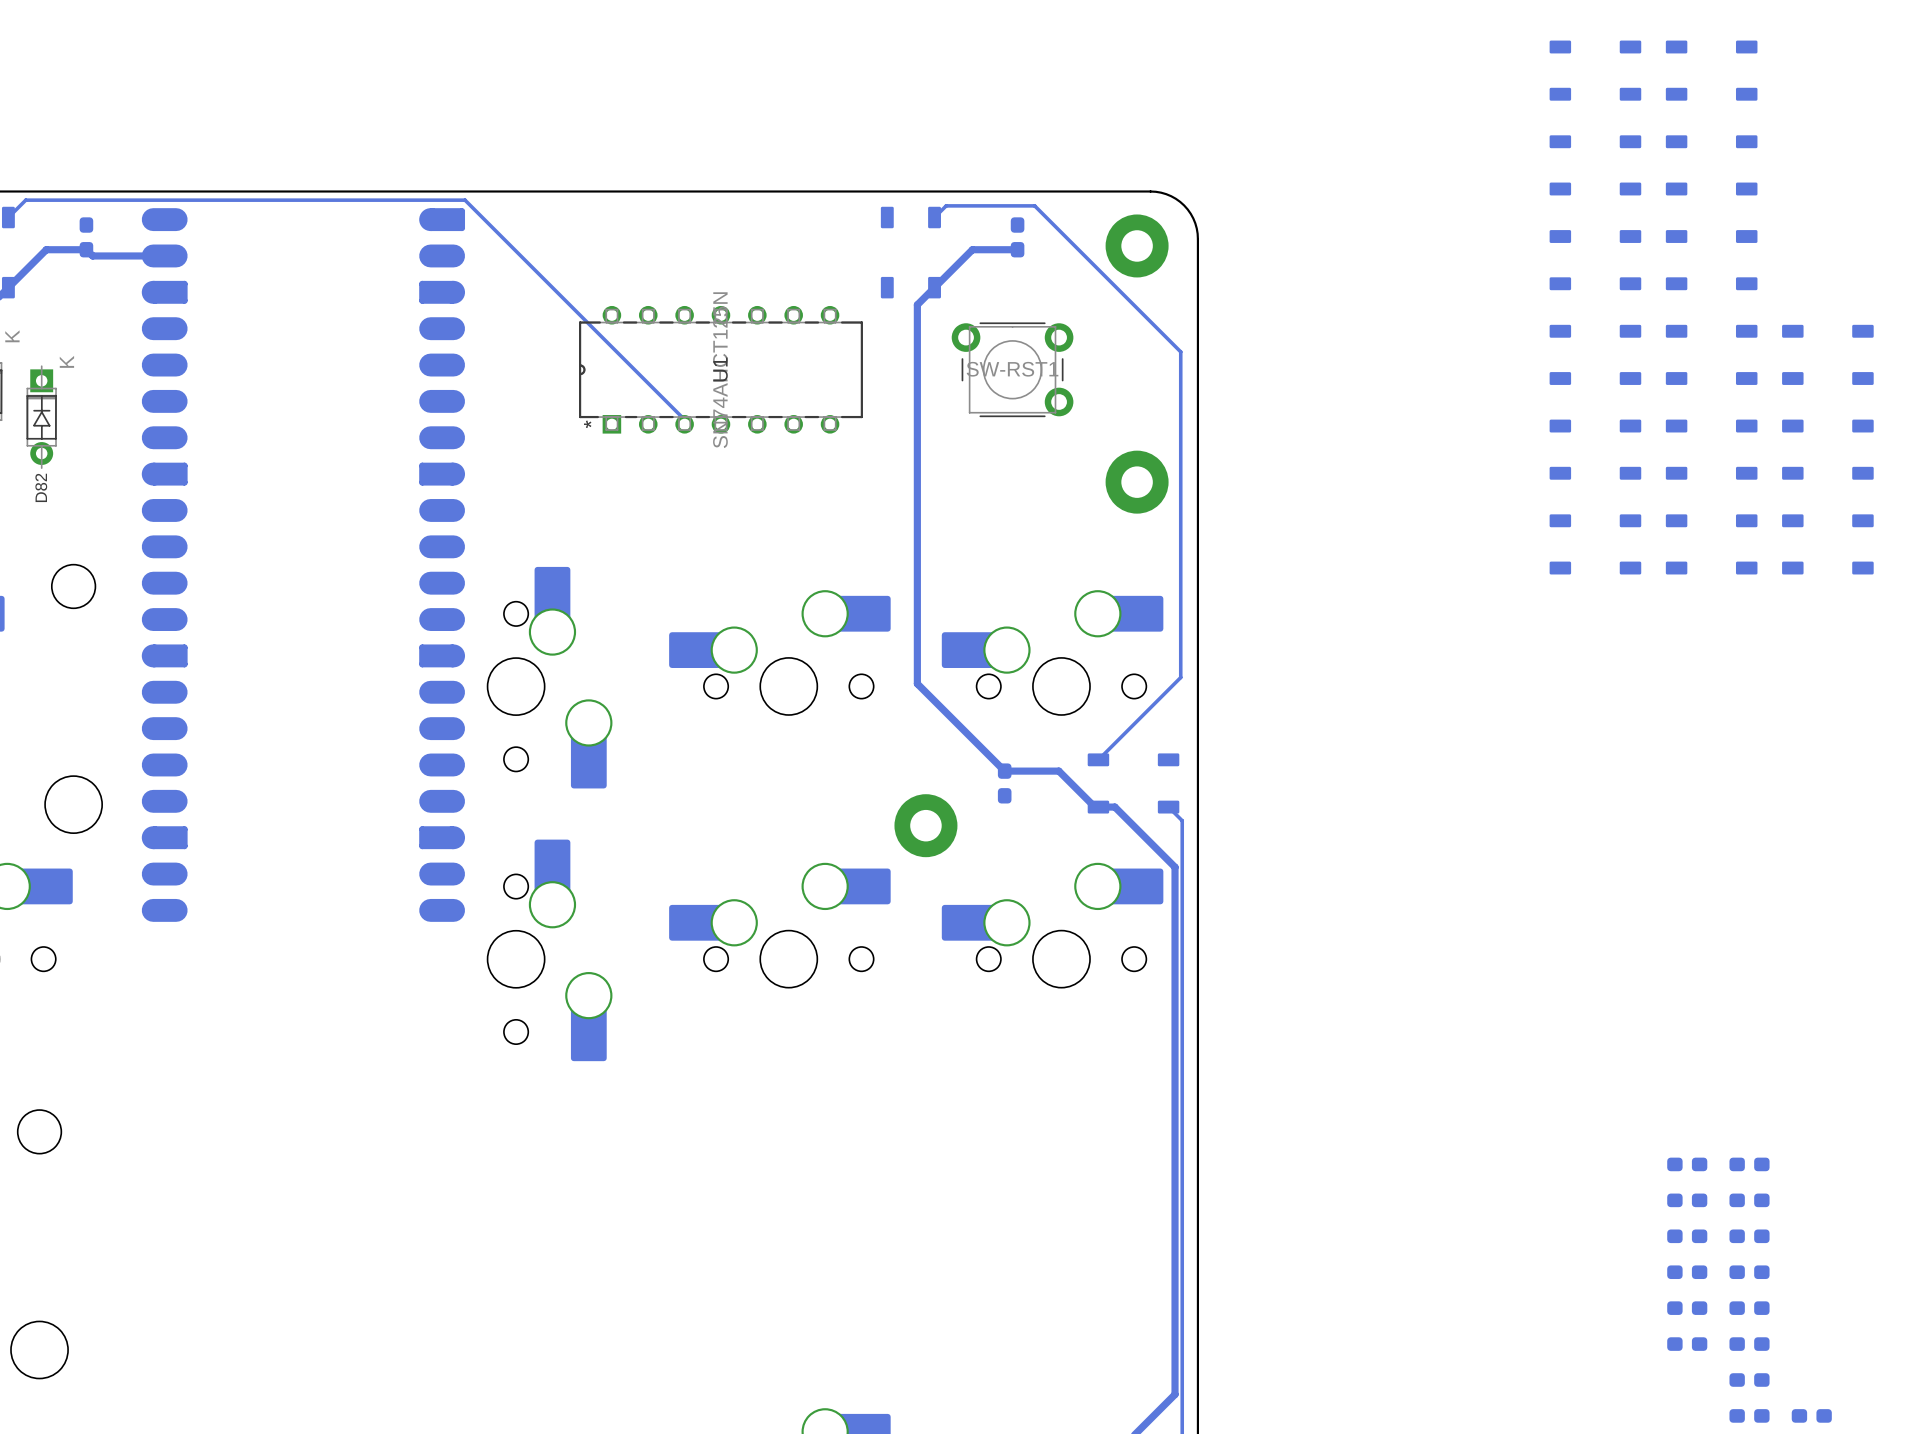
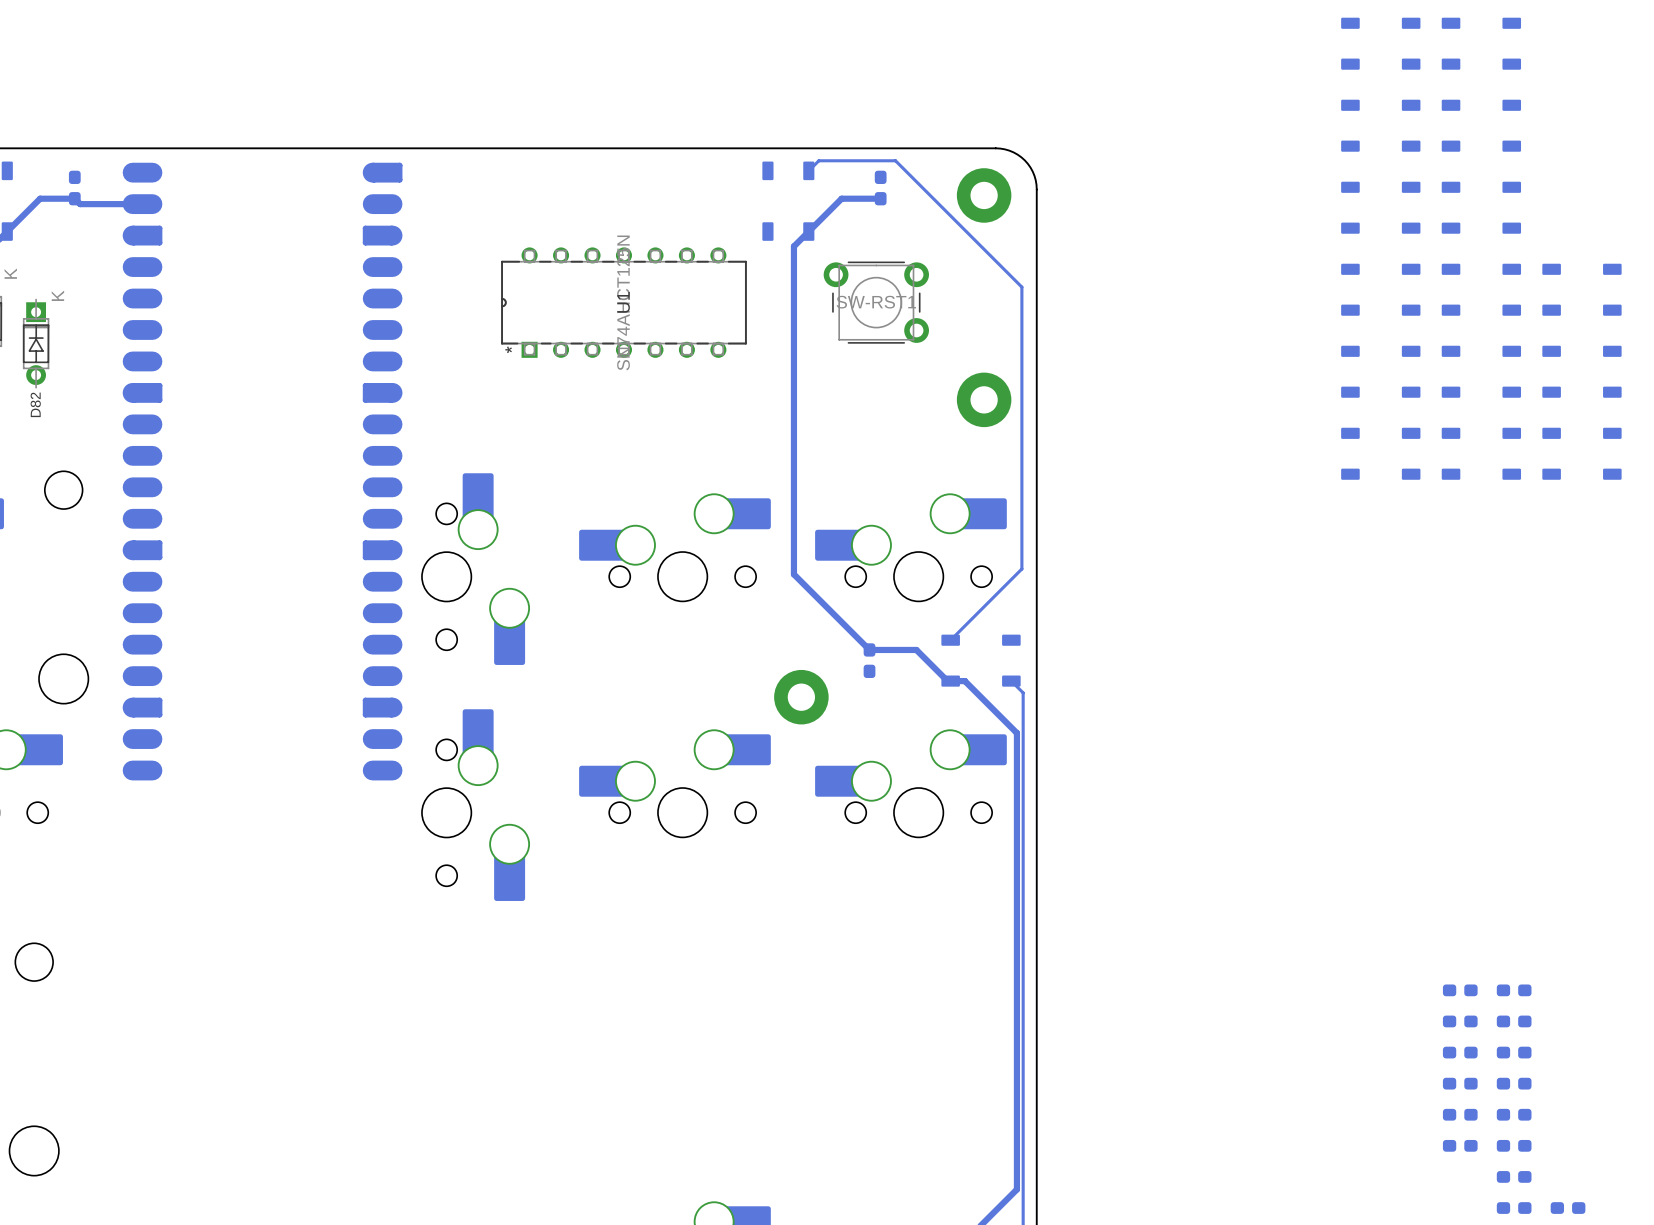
bottom track: (8, 217) (25, 200) (465, 200) (684, 419) (684, 424) -> none

